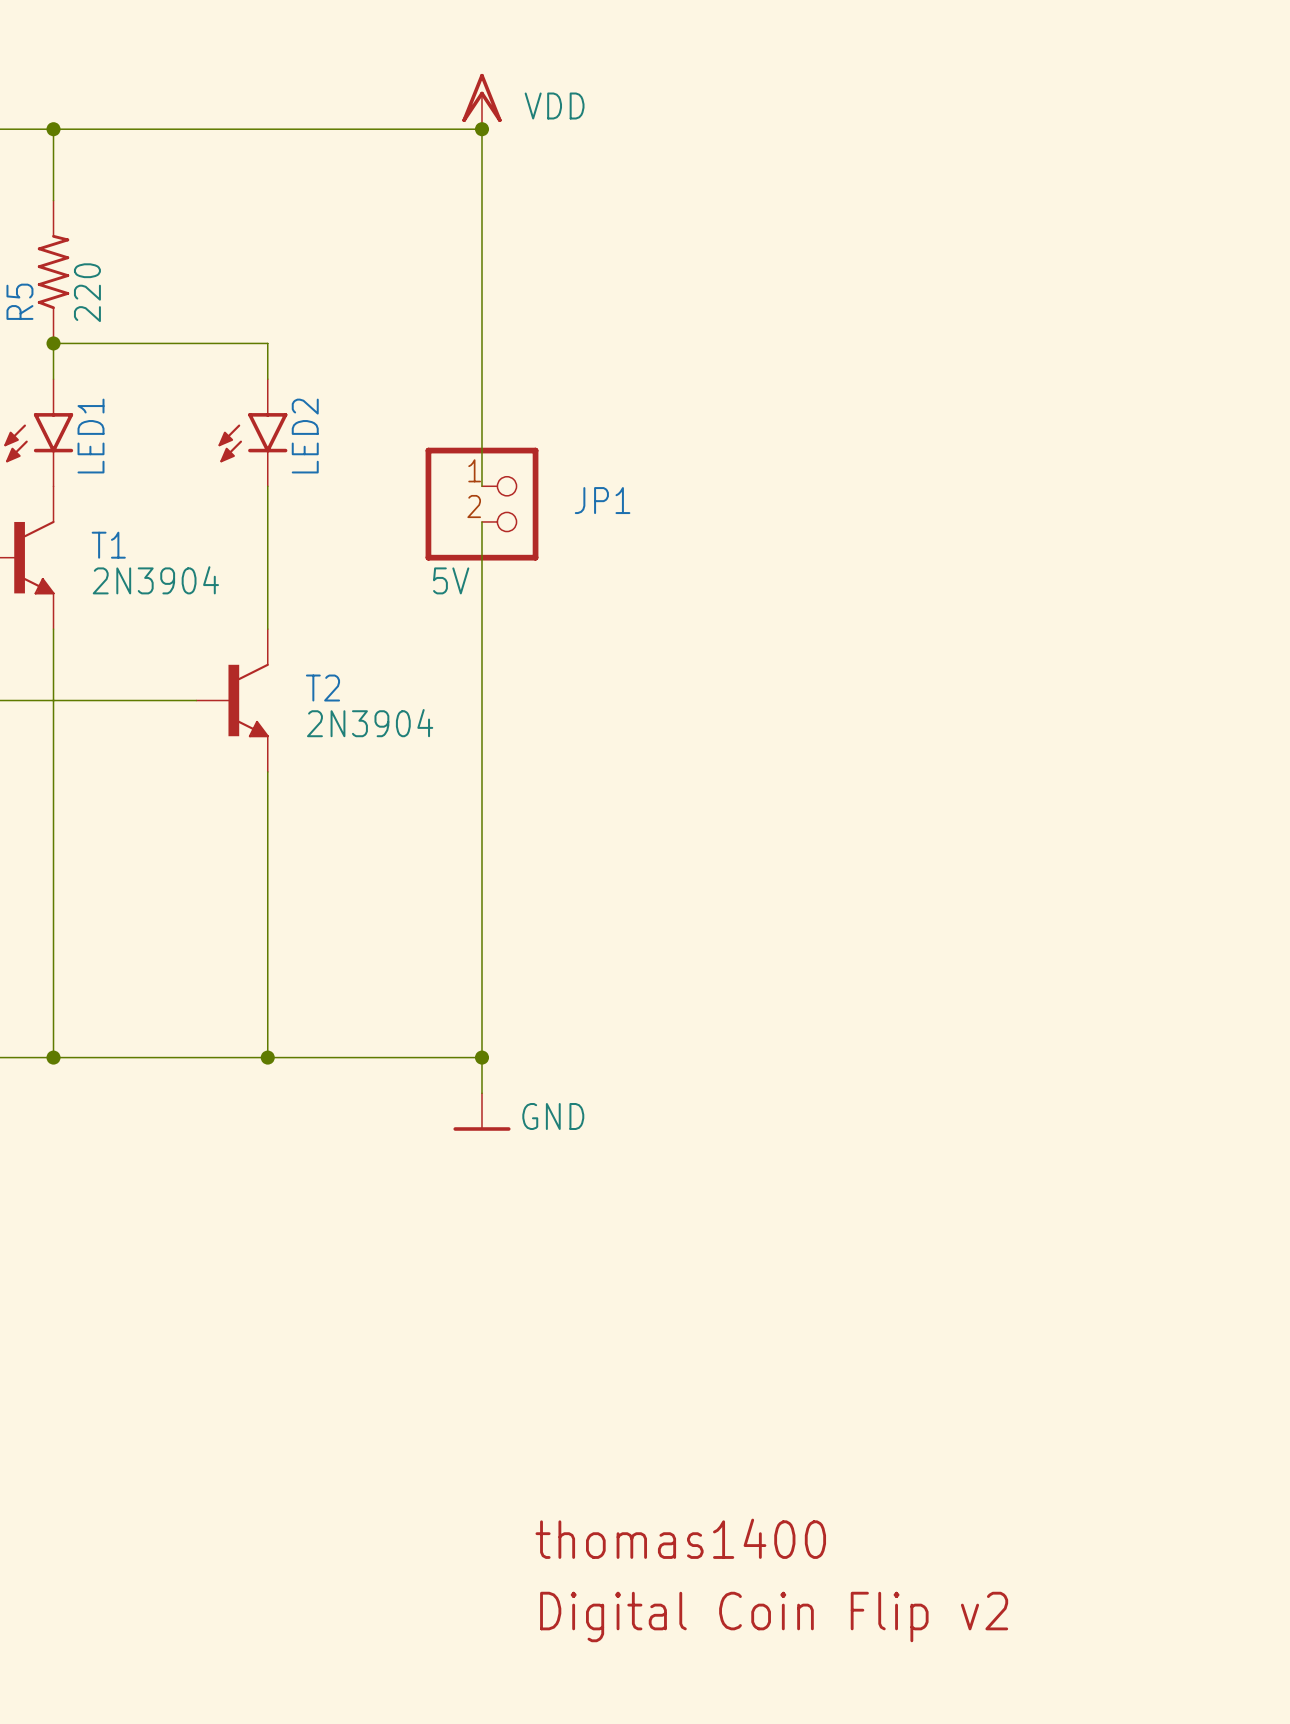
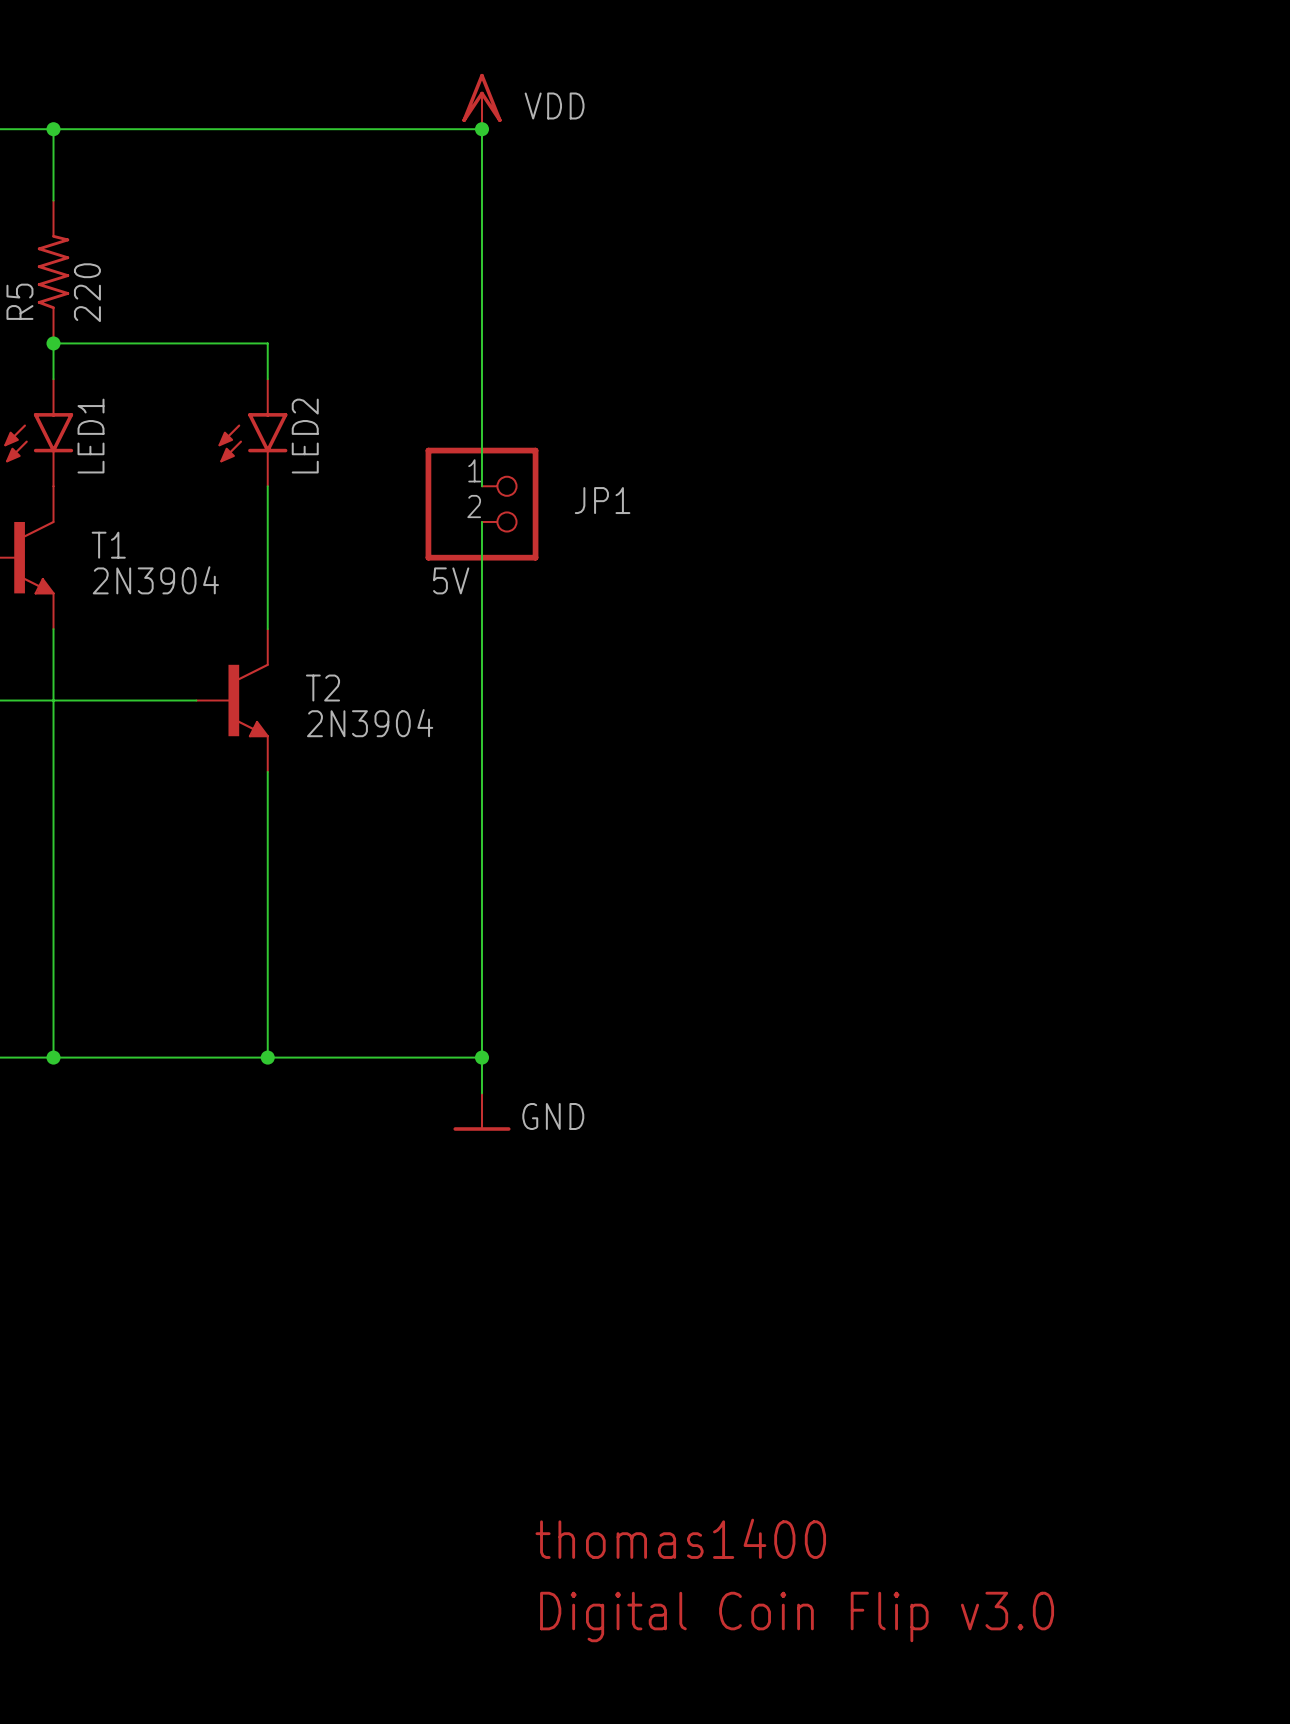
text: Digital Coin Flip v2 (774, 1616) -> Digital Coin Flip v3.0 (797, 1616)

